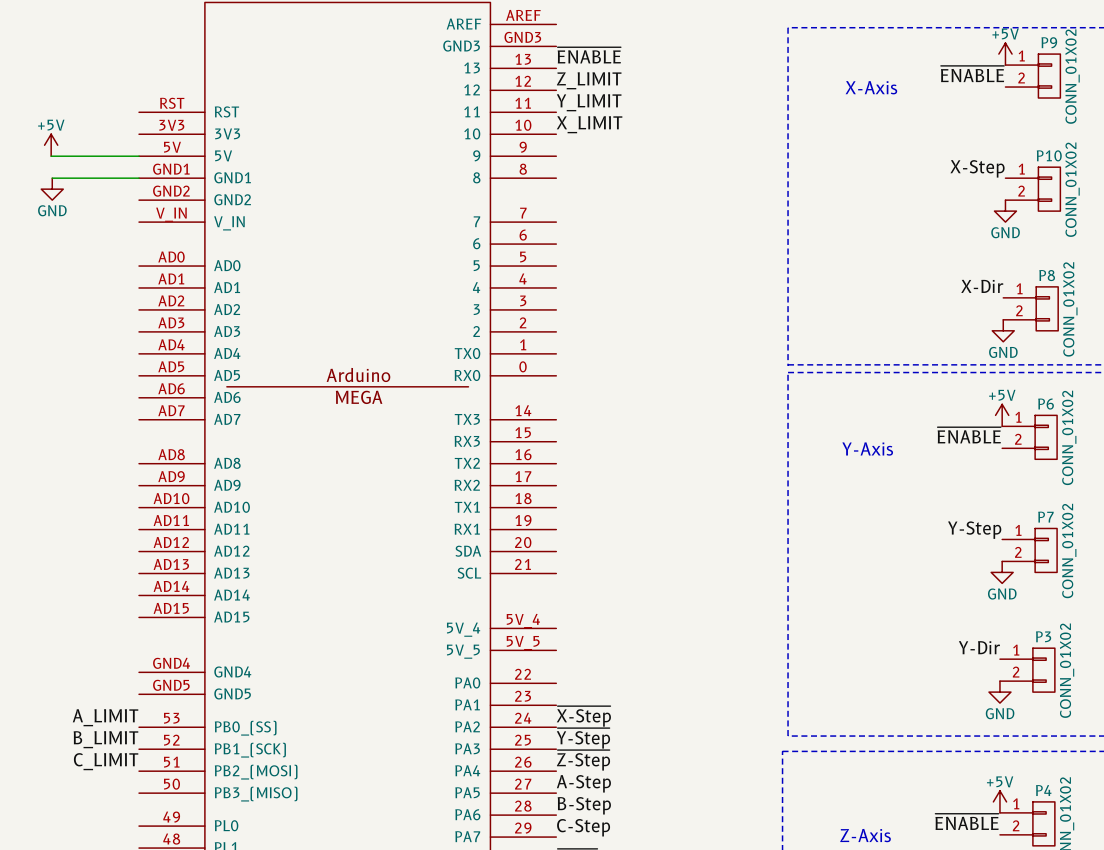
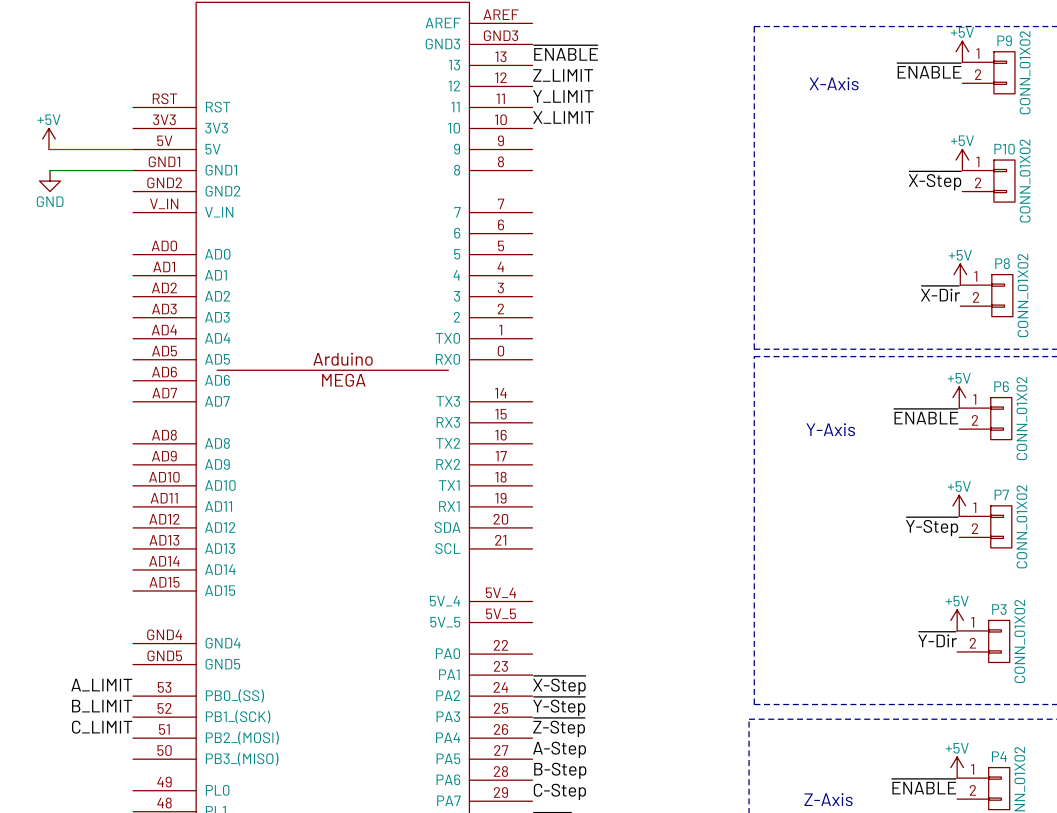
power symbol: none -> +5V (962, 160)
label: X-Step (977, 168) -> ~{X-Step} (934, 180)
power symbol: GND (1005, 211) -> none
label: X-Dir (982, 286) -> ~{X-Dir} (940, 293)
power symbol: none -> +5V (960, 274)
power symbol: GND (1003, 330) -> none
power symbol: none -> +5V (959, 505)
label: Y-Step (974, 530) -> ~{Y-Step} (932, 526)
power symbol: GND (1002, 572) -> none
label: Y-Dir (979, 647) -> ~{Y-Dir} (937, 639)
power symbol: none -> +5V (957, 620)
power symbol: GND (999, 692) -> none

